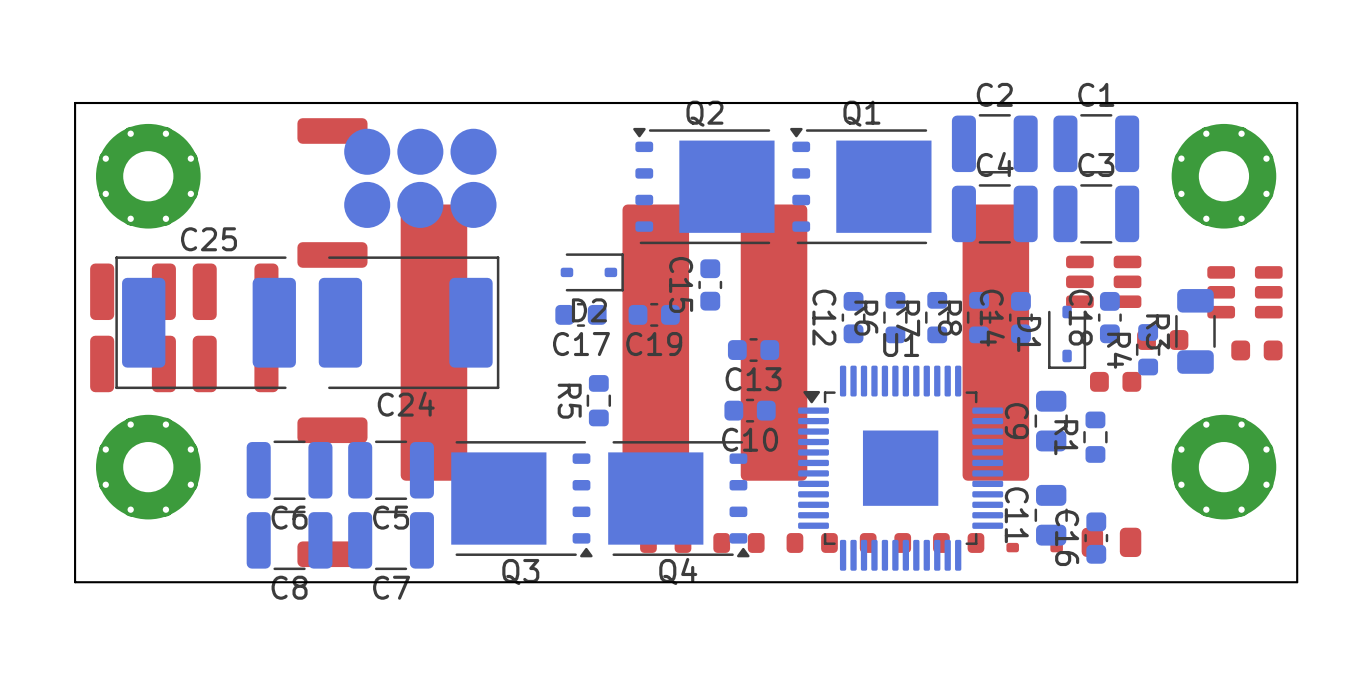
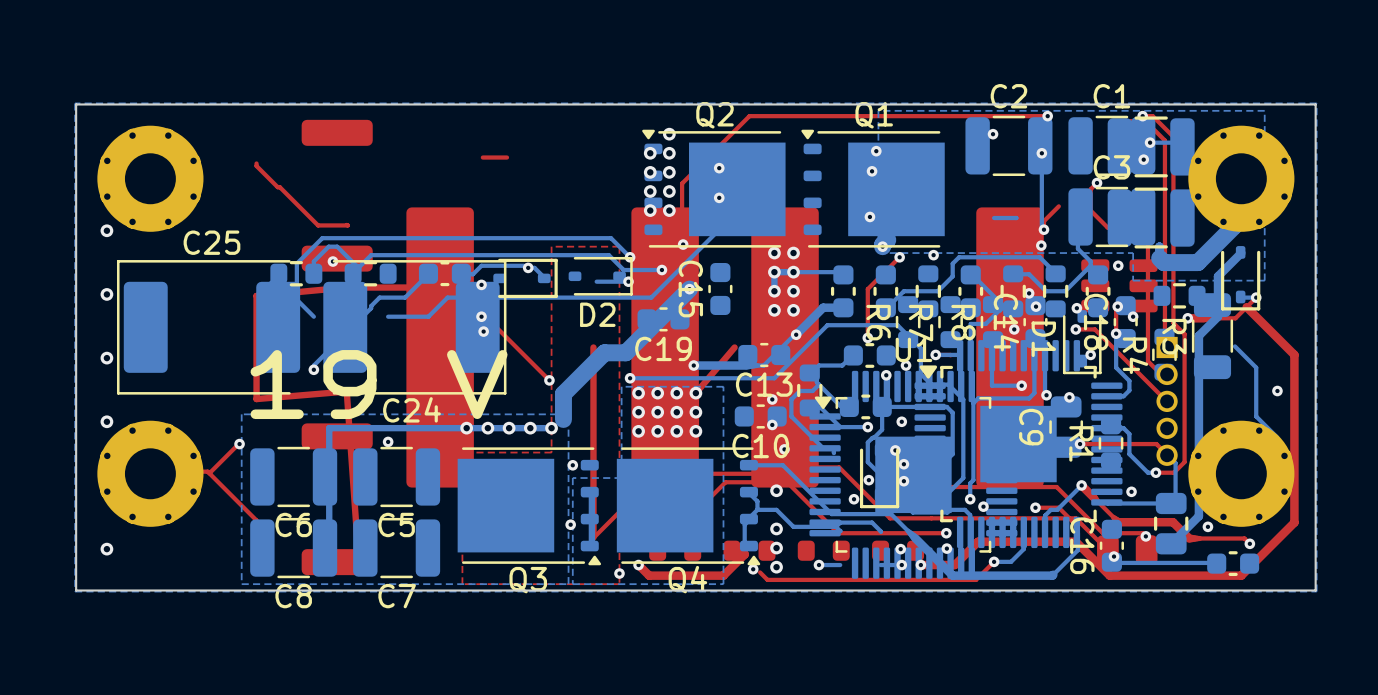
bottom zone outline: none -> (1316, 103) (75, 103) (75, 591) (1316, 591) (1316, 103)
bottom zone outline: none -> (1264, 110) (878, 110) (878, 253) (1133, 253) (1133, 280) (1264, 280) (1264, 110)
top track: none -> (1047, 116) (749, 116) (682, 183) (682, 228) (628, 281)
via: none -> (1047, 116)
top track: none -> (1142, 116) (1152, 116) (1173, 136) (1173, 323) (1184, 334) (1184, 462) (1173, 472) (1155, 472)
via: none -> (1142, 116)
top track: none -> (1128, 121) (1137, 127) (1152, 127) (1164, 140) (1164, 333) (1169, 337)
via: none -> (669, 134)
via: none -> (993, 134)
bottom track: none -> (1150, 142) (1177, 142) (1182, 146)
via: none -> (1150, 142)
part: none -> (1151, 146)
via: none -> (876, 151)
via: none -> (650, 153)
via: none -> (669, 153)
bottom track: none -> (1041, 153) (1041, 227)
via: none -> (1041, 153)
top track: none -> (506, 157) (482, 157)
via: none -> (1143, 159)
top track: none -> (256, 163) (256, 166) (318, 225) (346, 224)
via: none -> (719, 168)
via: none -> (872, 171)
via: none -> (650, 172)
via: none -> (669, 172)
part: (420, 178) -> none
top track: none -> (1097, 183) (1090, 189) (1090, 210) (1107, 227) (1117, 227)
via: none -> (1097, 183)
bottom track: none -> (1234, 185) (1234, 225) (1197, 262) (1163, 262) (1159, 258)
via: none -> (650, 191)
via: none -> (669, 191)
bottom track: none -> (719, 197) (719, 229) (651, 297) (447, 297) (428, 316) (388, 316)
via: none -> (719, 197)
top track: none -> (1058, 206) (1043, 221) (1043, 229)
via: none -> (650, 210)
via: none -> (669, 210)
top track: none -> (1122, 212) (1133, 212) (1147, 227) (1147, 361) (1160, 374)
via: none -> (869, 216)
C4: (994, 213) -> none
bottom track: none -> (1016, 218) (994, 218)
bottom track: none -> (1078, 218) (1077, 248) (1090, 261) (1090, 265) (1065, 291) (1046, 291) (1029, 274) (1013, 273)
part: none -> (1151, 218)
via: none -> (1043, 229)
via: none -> (106, 230)
bottom track: none -> (887, 239) (882, 246)
via: none -> (683, 244)
via: none -> (1041, 245)
top zone outline: none -> (619, 246) (551, 246) (551, 452) (462, 452) (462, 584) (619, 584) (619, 246)
via: none -> (882, 246)
via: none -> (774, 253)
via: none -> (793, 253)
bottom track: none -> (1241, 253) (1218, 276) (1218, 316) (1198, 335) (1198, 516) (1171, 543)
via: none -> (933, 255)
bottom track: none -> (630, 257) (610, 238) (322, 238) (296, 263) (296, 299) (313, 316)
via: none -> (630, 257)
top track: none -> (899, 257) (867, 289) (867, 337)
via: none -> (899, 257)
via: none -> (332, 261)
bottom track: none -> (523, 265) (481, 265) (473, 274) (462, 274)
via: none -> (1118, 265)
bottom track: none -> (358, 267) (337, 246) (328, 246) (313, 261) (313, 274)
bottom track: none -> (528, 267) (534, 267) (545, 278)
via: none -> (528, 267)
bottom track: none -> (661, 270) (623, 270) (608, 255) (371, 255) (352, 274)
via: none -> (661, 270)
via: none -> (774, 272)
via: none -> (793, 272)
part: none -> (296, 273)
part: none -> (370, 273)
bottom track: none -> (428, 273) (405, 297) (379, 297) (313, 365) (313, 369)
part: none -> (444, 273)
bottom track: none -> (843, 274) (840, 272) (774, 272) (774, 291)
bottom track: none -> (971, 274) (1005, 308) (1001, 308) (985, 323) (970, 323) (970, 355)
bottom track: none -> (1056, 274) (1039, 257) (959, 257) (952, 263) (952, 276) (937, 291) (903, 291) (886, 308)
part: none -> (525, 278)
part: none -> (1240, 278)
bottom track: none -> (628, 281) (596, 281)
via: none -> (628, 281)
via: none -> (481, 284)
top track: none -> (418, 287) (346, 287) (256, 295) (256, 399) (346, 391) (357, 537)
bottom track: none -> (689, 289) (625, 352) (604, 352) (563, 393) (563, 419)
via: none -> (689, 289)
via: none -> (774, 291)
via: none -> (793, 291)
part: none -> (843, 291)
part: none -> (885, 291)
part: none -> (928, 291)
part: none -> (970, 291)
part: none -> (1013, 291)
part: none -> (1055, 291)
part: none -> (1098, 291)
via: none -> (1029, 293)
via: none -> (106, 294)
part: (133, 291) -> none
part: (235, 291) -> none
part: none -> (1179, 295)
part: (1244, 292) -> none
bottom track: none -> (1254, 297) (1241, 297)
top track: none -> (1256, 297) (1235, 318) (1187, 318)
via: none -> (1256, 297)
via: none -> (1036, 306)
via: none -> (1117, 306)
top track: none -> (1246, 307) (1294, 354) (1294, 522) (1241, 575) (1109, 575) (1075, 541) (978, 541) (954, 565) (920, 565)
bottom track: none -> (843, 307) (823, 307) (796, 334)
via: none -> (1076, 308)
top track: none -> (1116, 308) (1116, 333)
top track: none -> (454, 309) (461, 316) (485, 316) (549, 380)
via: none -> (774, 310)
via: none -> (793, 310)
via: none -> (481, 316)
via: none -> (1133, 316)
via: none -> (1187, 318)
C17: (580, 314) -> none
C12: (853, 317) -> none
via: none -> (1014, 329)
top track: none -> (1075, 329) (1094, 329) (1167, 401)
via: none -> (1075, 329)
via: none -> (483, 331)
bottom track: none -> (795, 333) (763, 365) (693, 365)
bottom track: none -> (1116, 333) (1116, 367) (1129, 380) (1129, 390) (1123, 396) (1106, 396)
via: none -> (1116, 333)
via: none -> (796, 334)
via: none -> (867, 337)
part: (1162, 340) -> none
bottom track: none -> (1234, 346) (1256, 367) (1256, 416) (1277, 437)
top track: none -> (593, 347) (593, 537) (657, 473) (778, 473) (838, 533) (946, 533)
top track: none -> (734, 347) (695, 393)
bottom track: none -> (852, 354) (842, 365) (818, 365) (810, 374)
bottom track: none -> (935, 354) (960, 355)
via: none -> (935, 354)
via: none -> (1090, 354)
part: none -> (869, 355)
bottom track: none -> (991, 355) (991, 385) (1021, 385)
bottom track: none -> (1034, 355) (1034, 393) (1029, 398) (978, 398) (973, 403) (973, 480) (970, 483) (970, 499)
bottom track: none -> (1045, 355) (1046, 395)
part: (1256, 350) -> none
via: none -> (106, 358)
via: none -> (693, 365)
via: none -> (906, 365)
part: (133, 363) -> none
part: (235, 363) -> none
via: none -> (313, 369)
bottom track: none -> (810, 374) (840, 405) (849, 406)
via: none -> (886, 375)
bottom track: none -> (630, 378) (774, 378) (827, 325) (897, 325) (920, 348) (920, 374) (929, 384)
via: none -> (630, 378)
via: none -> (549, 380)
text: none -> 19 V (379, 384)
bottom track: none -> (818, 384) (812, 391) (799, 391) (791, 399) (791, 416) (823, 448) (833, 448) (833, 453)
bottom track: none -> (929, 384) (948, 384) (963, 399) (963, 478) (948, 492) (939, 492) (937, 490) (930, 491)
via: none -> (1021, 385)
bottom zone outline: none -> (723, 386) (621, 386) (621, 478) (572, 478) (572, 584) (723, 584) (723, 386)
part: (1115, 381) -> none
part: none -> (809, 390)
via: none -> (1277, 391)
via: none -> (638, 393)
via: none -> (657, 393)
via: none -> (676, 393)
via: none -> (695, 393)
via: none -> (1046, 395)
via: none -> (1069, 397)
via: none -> (772, 399)
part: none -> (1167, 401)
R5: (598, 400) -> none
part: none -> (865, 406)
bottom track: none -> (810, 407) (821, 407) (840, 427) (867, 427)
via: none -> (638, 412)
via: none -> (657, 412)
via: none -> (676, 412)
via: none -> (695, 412)
bottom zone outline: none -> (568, 414) (241, 414) (241, 584) (568, 584) (568, 414)
via: none -> (106, 421)
via: none -> (901, 421)
via: none -> (772, 424)
via: none -> (867, 427)
via: none -> (466, 428)
via: none -> (487, 428)
via: none -> (509, 428)
via: none -> (530, 428)
bottom track: none -> (551, 428) (329, 428) (329, 548)
via: none -> (551, 428)
bottom track: none -> (1106, 428) (1123, 428) (1129, 433) (1129, 454) (1147, 472) (1155, 472)
via: none -> (638, 431)
via: none -> (657, 431)
via: none -> (676, 431)
via: none -> (695, 431)
via: none -> (388, 441)
top track: none -> (753, 441) (759, 441) (785, 467) (839, 467) (890, 518) (1075, 518)
top track: none -> (239, 444) (209, 473)
via: none -> (239, 444)
part: none -> (1018, 444)
top track: none -> (1080, 444) (1156, 444) (1167, 454)
via: none -> (1080, 444)
via: none -> (784, 449)
via: none -> (895, 450)
bottom track: none -> (1167, 455) (1175, 463) (1175, 499) (1171, 503) (1106, 502)
bottom track: none -> (930, 459) (946, 459) (952, 454) (952, 412) (946, 406) (882, 406) (882, 429) (867, 442) (867, 462) (907, 501) (907, 507) (912, 512) (947, 512) (950, 509) (964, 509) (970, 515) (970, 518)
top track: none -> (903, 464) (926, 487) (1056, 487) (1102, 533) (1142, 533) (1145, 536)
via: none -> (903, 464)
via: none -> (572, 465)
bottom track: none -> (748, 465) (782, 465) (831, 514) (891, 514) (952, 575) (1052, 575) (1077, 550) (1077, 533)
via: none -> (1155, 472)
part: none -> (879, 476)
via: none -> (868, 480)
via: none -> (903, 481)
top track: none -> (1081, 485) (1118, 522) (1172, 522) (1189, 538) (1244, 538) (1249, 543)
bottom track: none -> (1081, 485) (1057, 509) (1050, 509) (1045, 515) (1045, 532)
via: none -> (1081, 485)
top track: none -> (776, 490) (768, 482) (725, 482) (706, 500)
via: none -> (776, 490)
via: none -> (1131, 491)
bottom track: none -> (591, 492) (591, 546)
bottom track: none -> (748, 492) (757, 501) (757, 509)
via: none -> (854, 499)
via: none -> (970, 499)
via: none -> (983, 506)
top track: none -> (1035, 507) (1058, 507) (1072, 521) (1075, 518)
via: none -> (1035, 507)
top track: none -> (156, 509) (175, 495) (199, 471) (207, 471) (256, 520) (256, 531)
bottom track: none -> (757, 509) (776, 509) (793, 526) (835, 526)
bottom track: none -> (757, 509) (744, 524) (744, 541) (748, 545)
top track: none -> (1075, 518) (1114, 556)
C11: (1051, 515) -> none
part: none -> (1171, 523)
via: none -> (570, 524)
bottom track: none -> (835, 526) (840, 531)
bottom track: none -> (835, 526) (840, 522) (872, 522) (880, 531)
via: none -> (1207, 526)
via: none -> (776, 528)
bottom track: none -> (1023, 532) (1023, 549) (1011, 561) (994, 561)
via: none -> (946, 533)
via: none -> (1145, 536)
via: none -> (1249, 543)
top track: none -> (738, 548) (744, 554) (723, 575) (649, 575) (638, 565)
via: none -> (776, 548)
via: none -> (946, 548)
via: none -> (106, 549)
via: none -> (900, 549)
part: (958, 542) -> none
part: (1034, 547) -> none
bottom track: none -> (1114, 556) (1120, 562) (1216, 563)
via: none -> (1114, 556)
via: none -> (994, 561)
top track: none -> (993, 562) (976, 579) (767, 579) (760, 572)
part: none -> (1233, 563)
via: none -> (638, 565)
via: none -> (818, 565)
bottom track: none -> (840, 565) (821, 565)
bottom track: none -> (899, 565) (880, 565)
via: none -> (901, 565)
via: none -> (920, 565)
via: none -> (776, 567)
via: none -> (753, 569)
via: none -> (619, 573)

